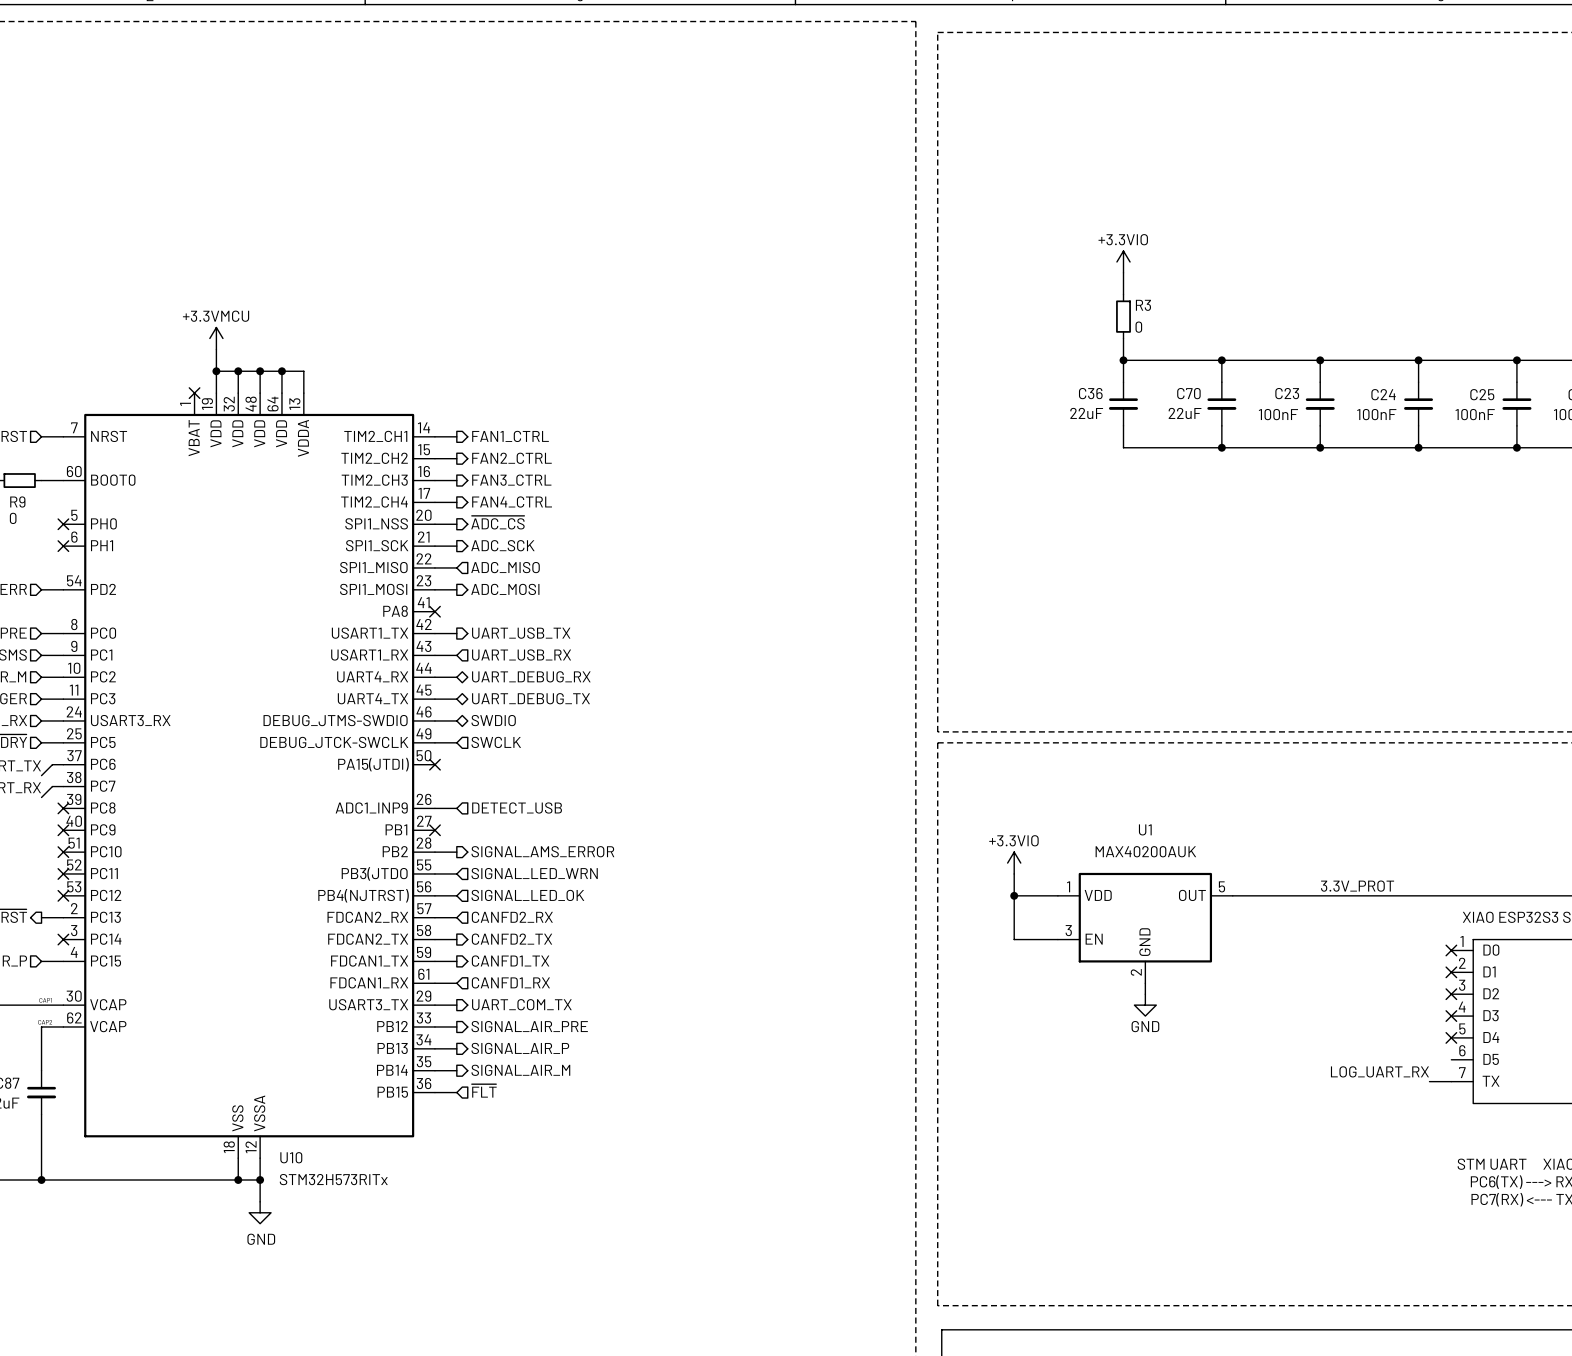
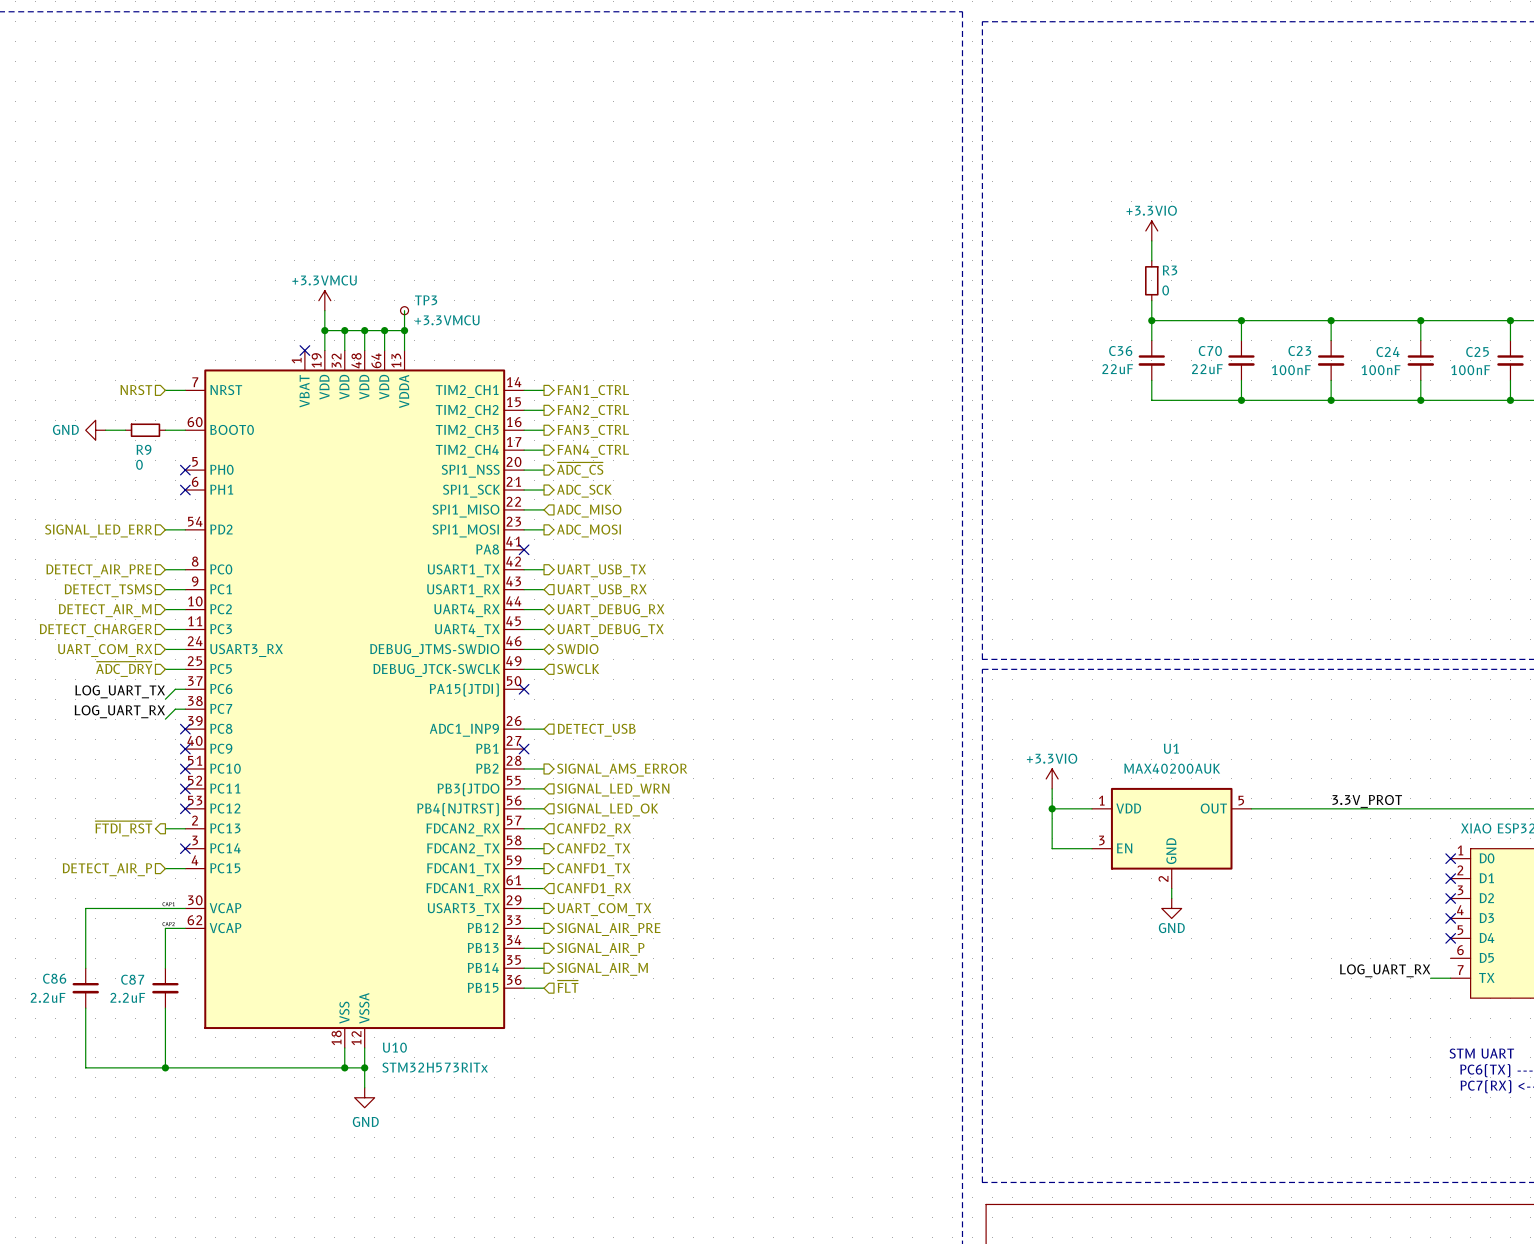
wire: none -> (404, 310) (404, 330)
TP3: none -> +3.3VMCU (404, 310)
junction: none -> (404, 330)

